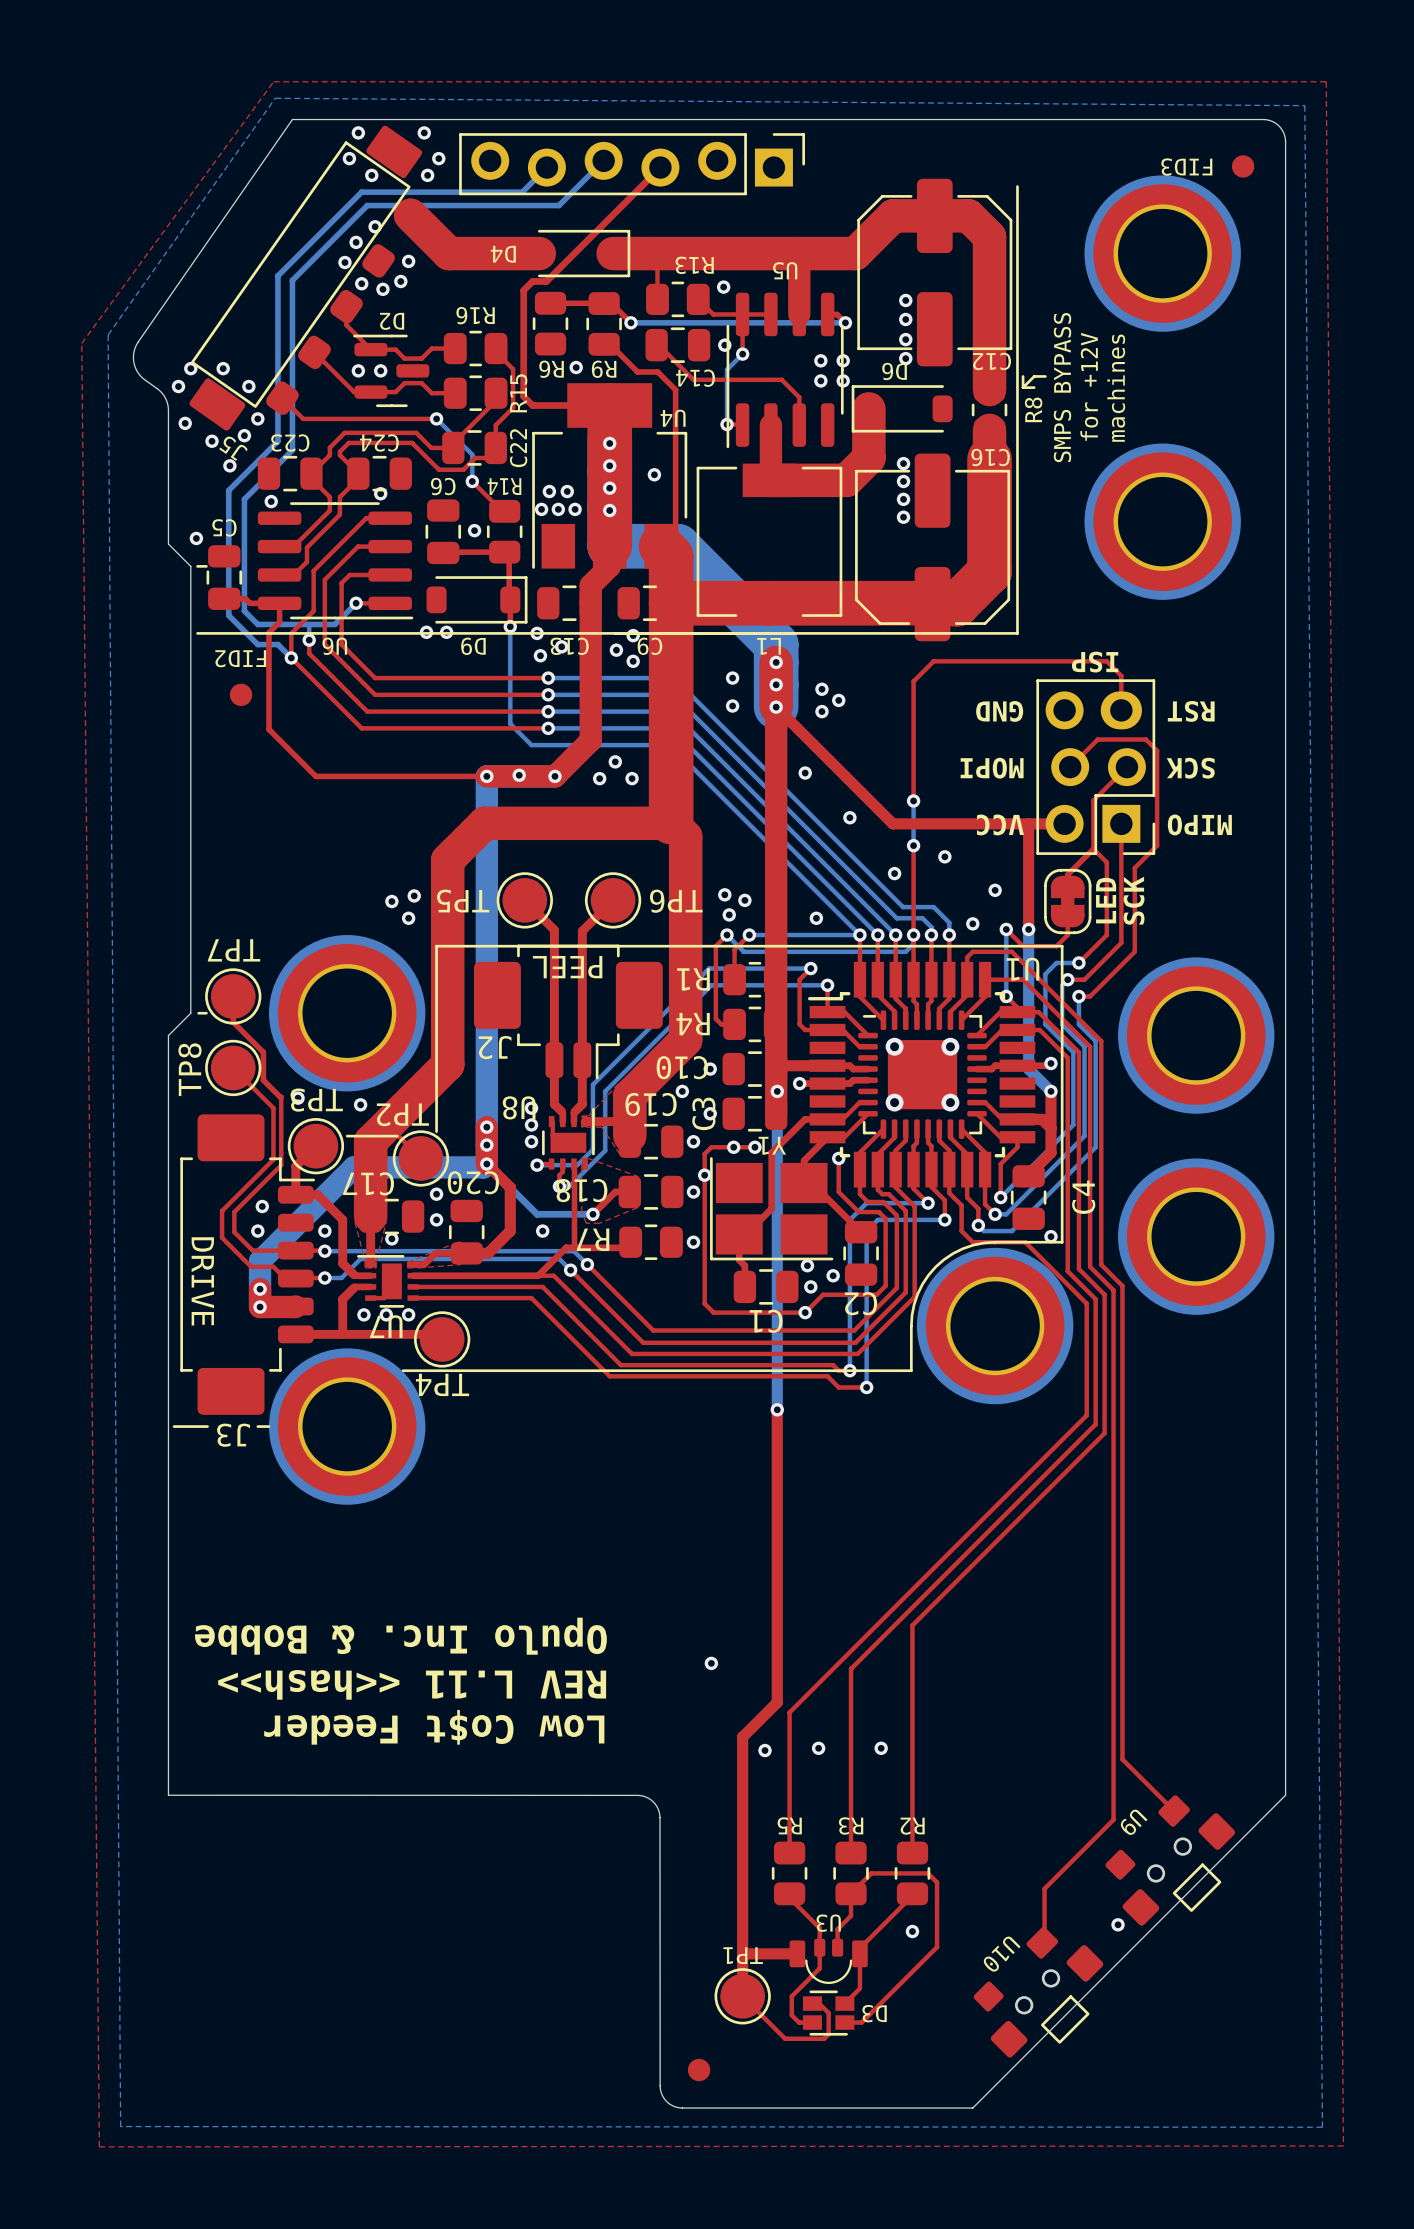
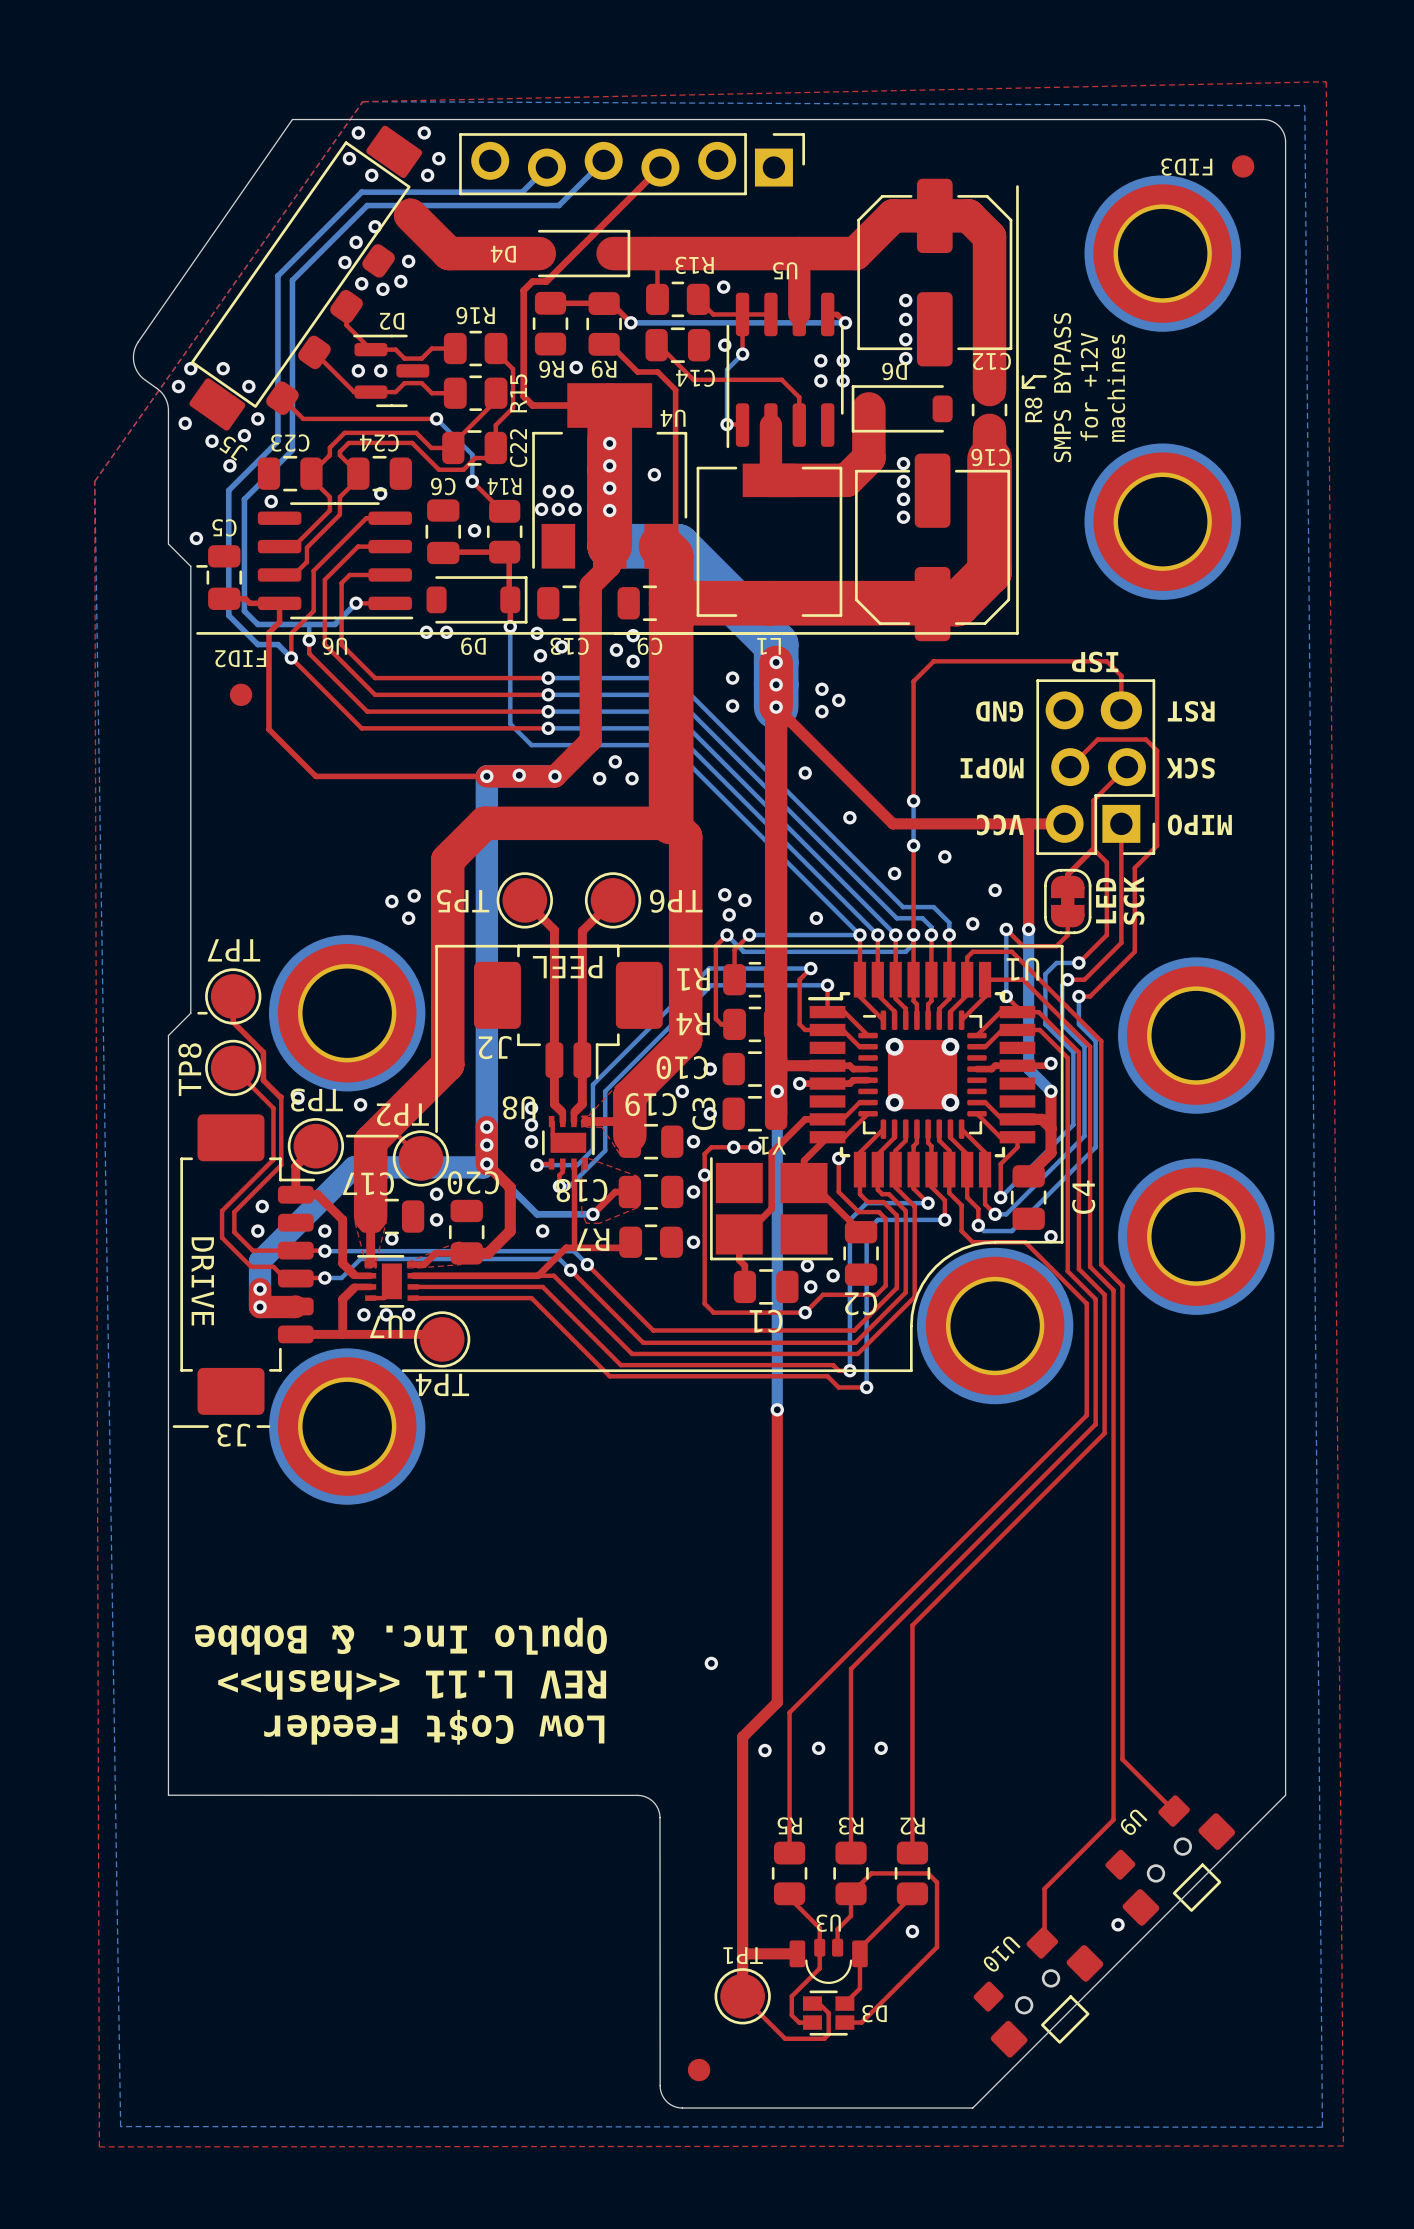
top zone outline: (1326, 81) (273, 81) (81, 343) (99, 2146) -> (1326, 81) (362, 101) (94, 481) (99, 2146)
bottom zone outline: (1304, 105) (275, 98) (108, 334) (120, 2126) -> (1304, 105) (362, 101) (94, 481) (120, 2126)

